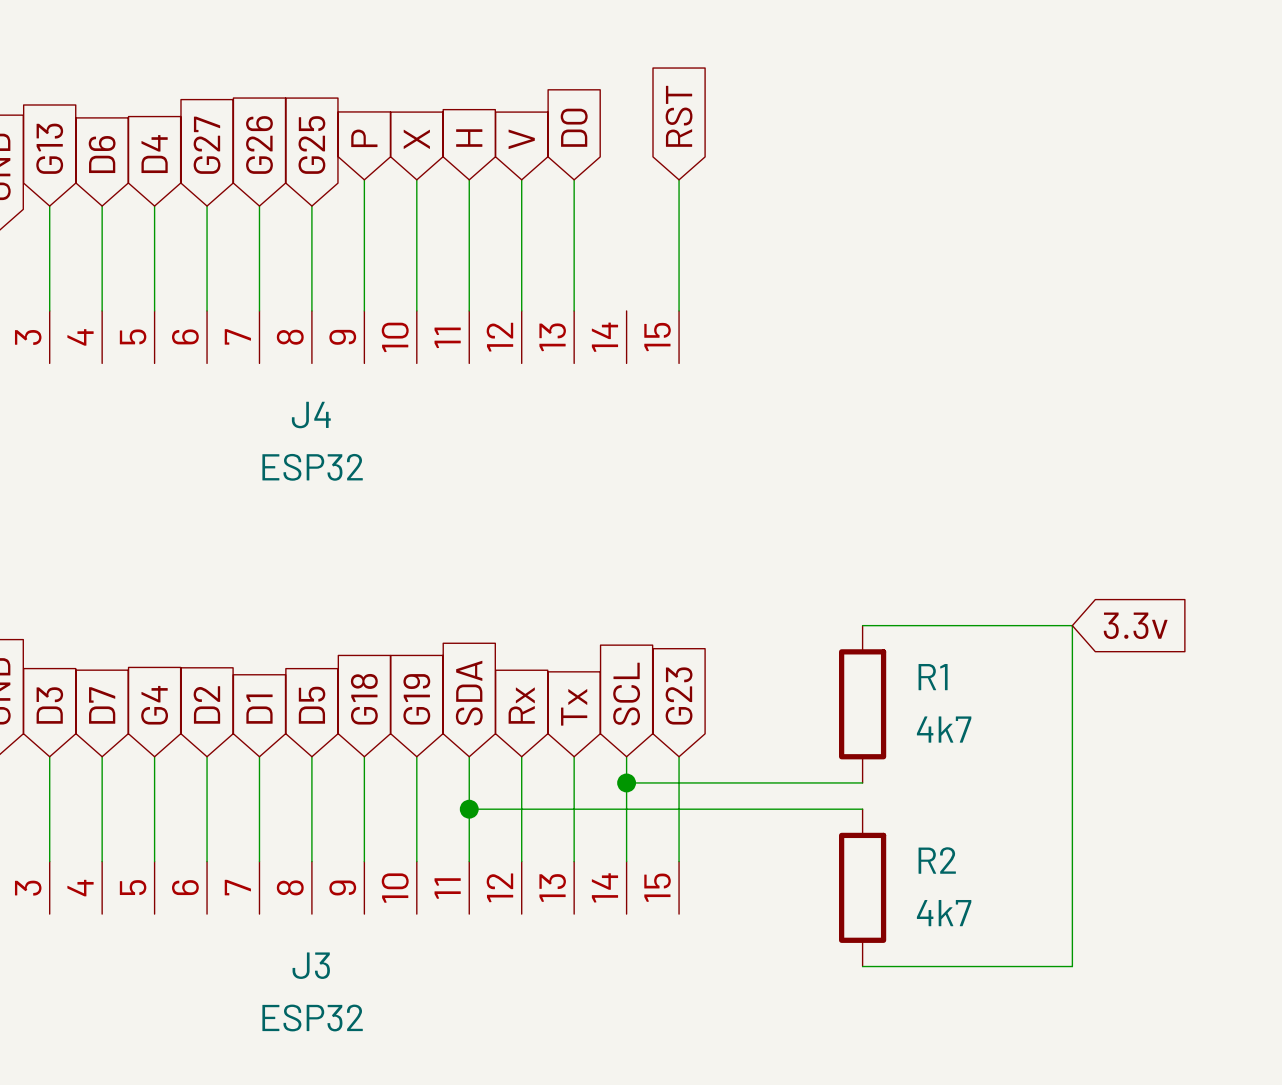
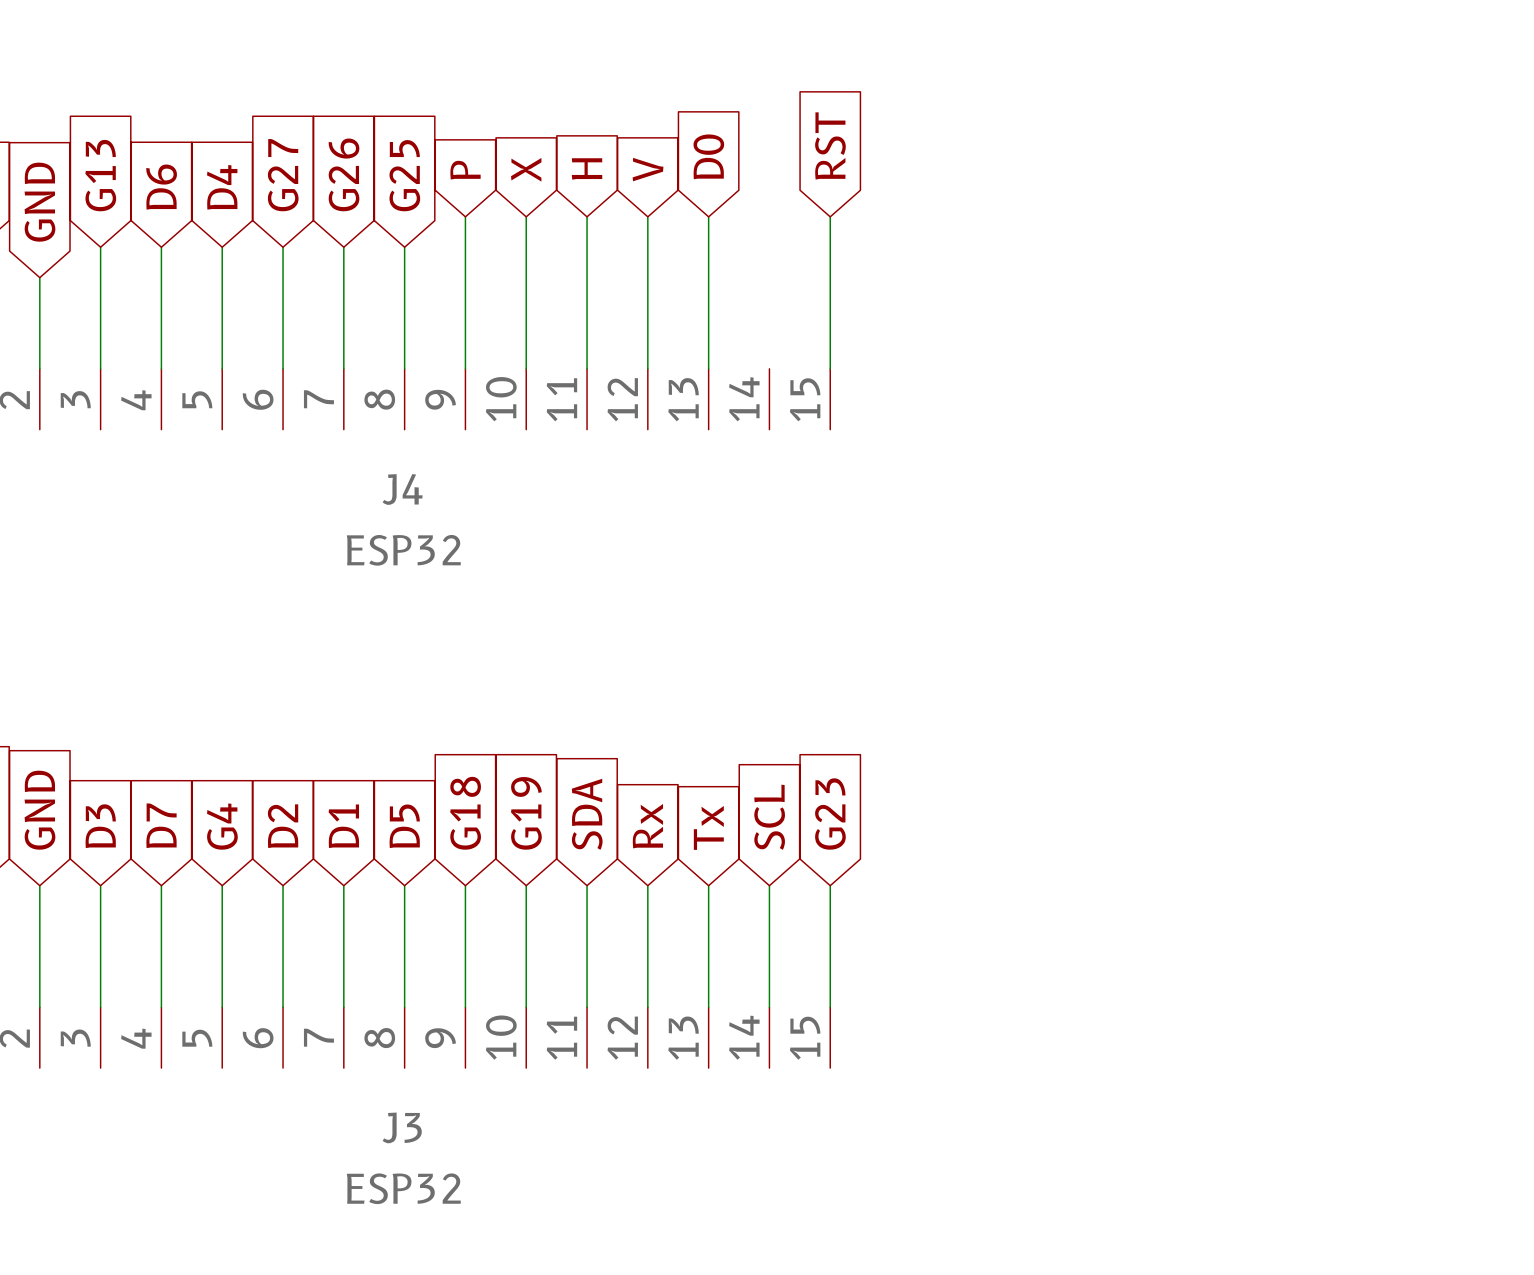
wire: (862, 625) (1072, 625) (1072, 966) (862, 966) -> none
global label: 3.3v (1135, 625) -> none
R1: 4k7 (862, 704) -> none
wire: (626, 782) (862, 782) -> none
junction: (626, 782) -> none
wire: (469, 809) (862, 809) -> none
junction: (469, 809) -> none
R2: 4k7 (862, 887) -> none

